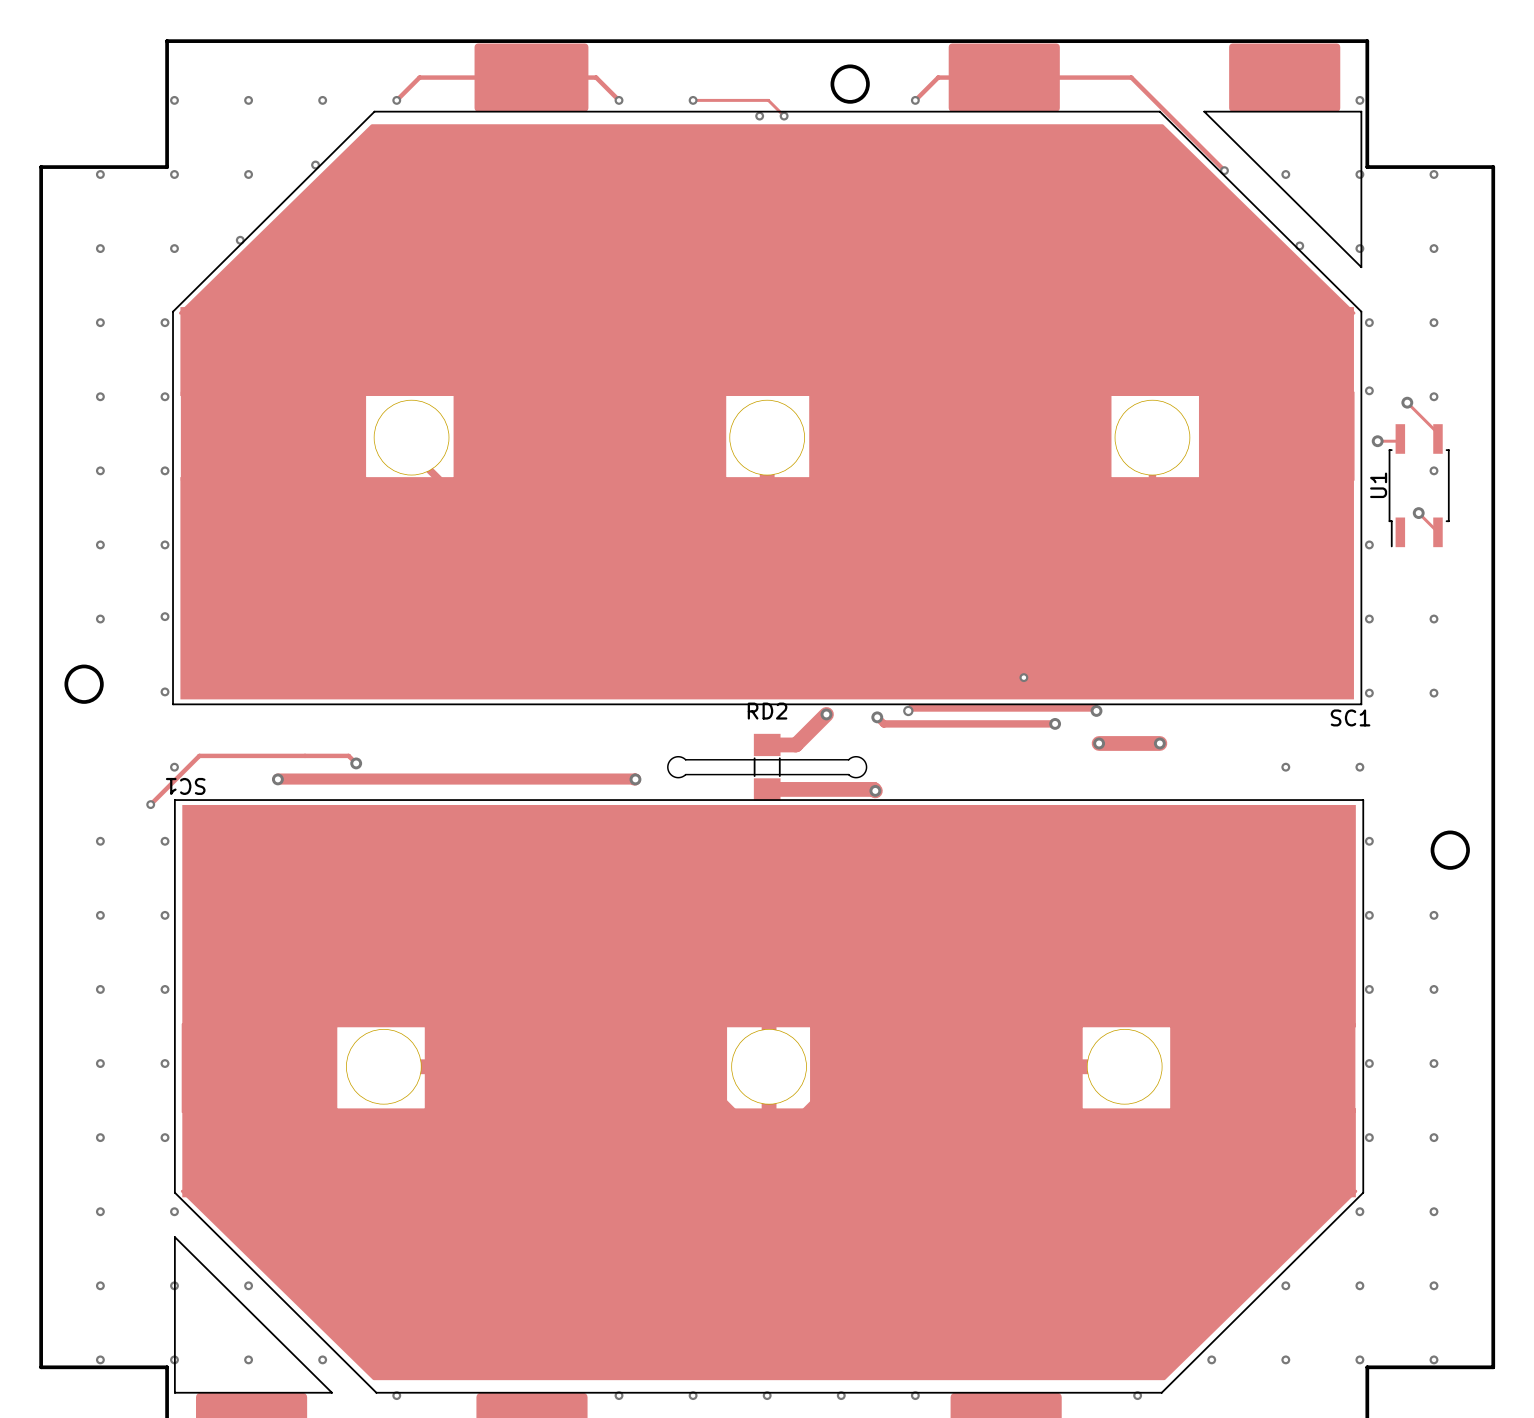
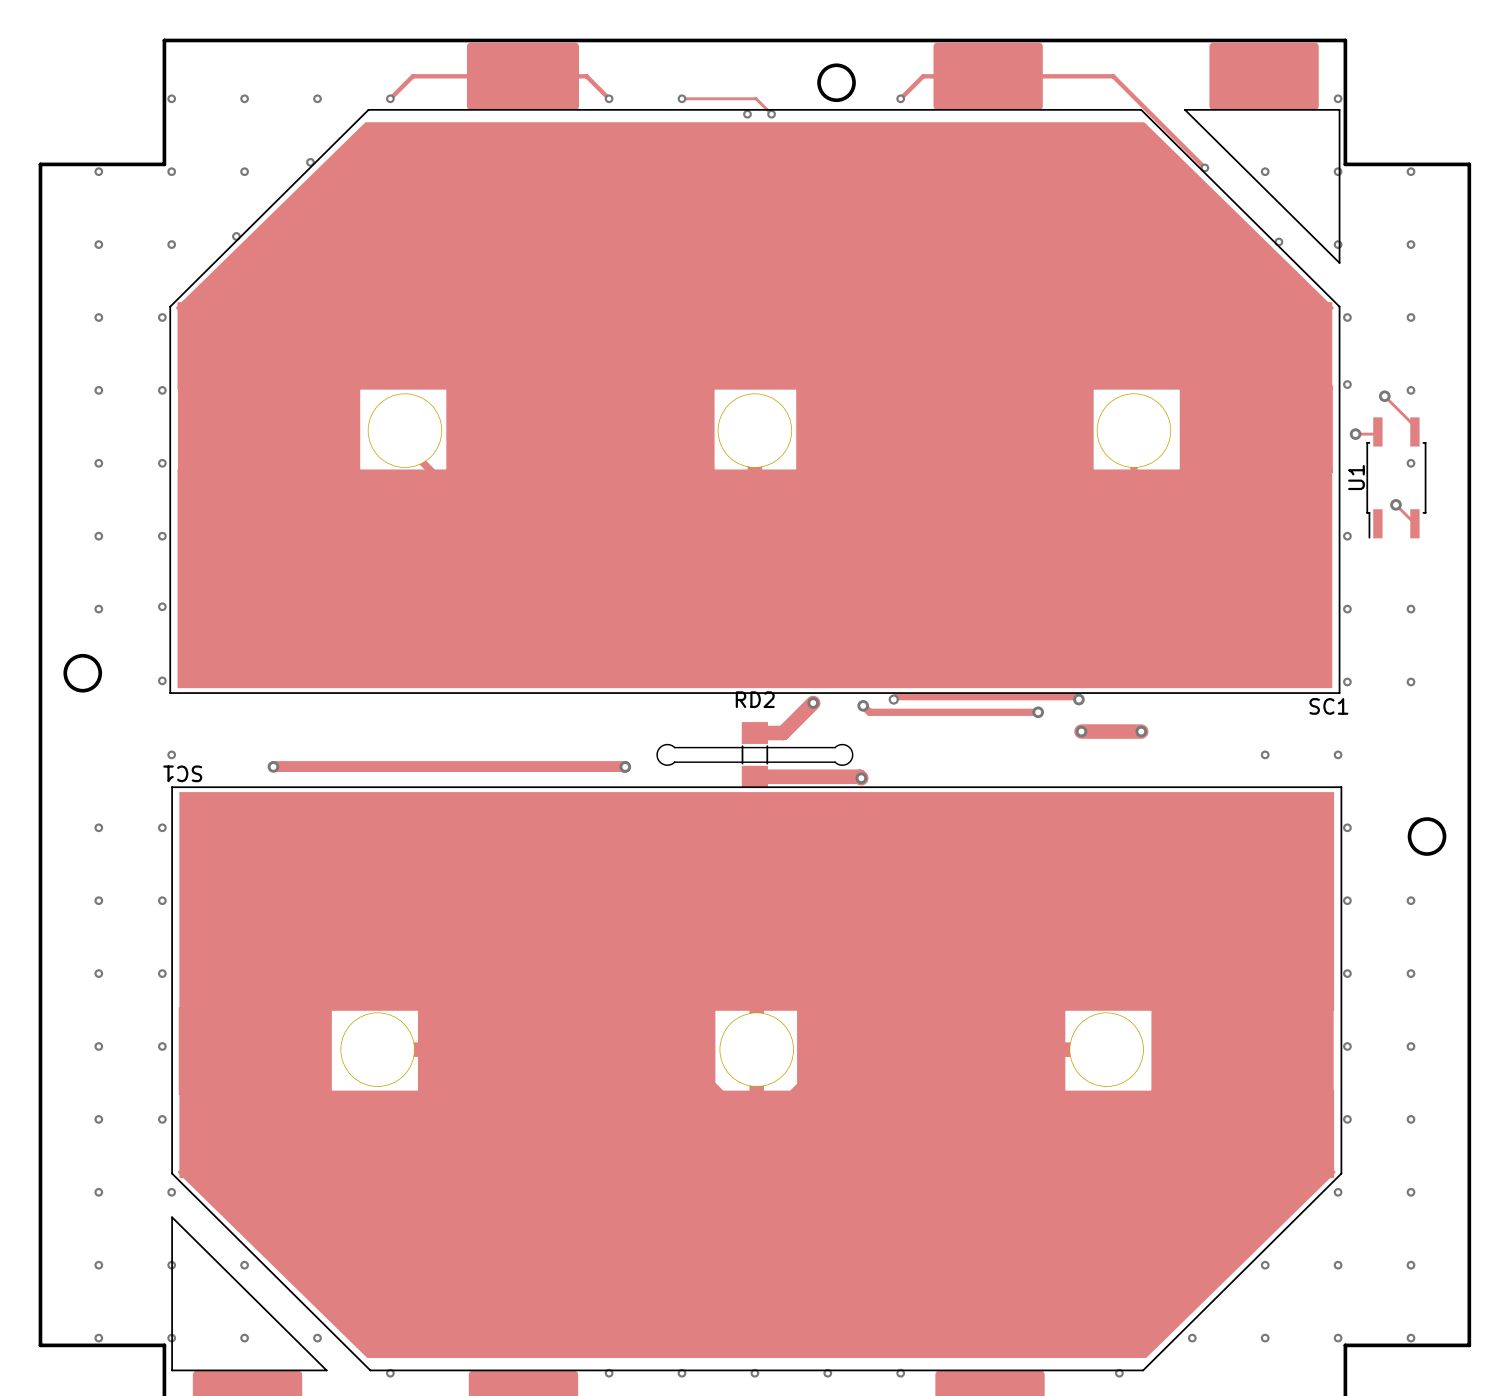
via: (1023, 677) -> none
track: (356, 763) (348, 755) (199, 755) (150, 804) -> none
via: (356, 763) -> none
via: (150, 804) -> none

